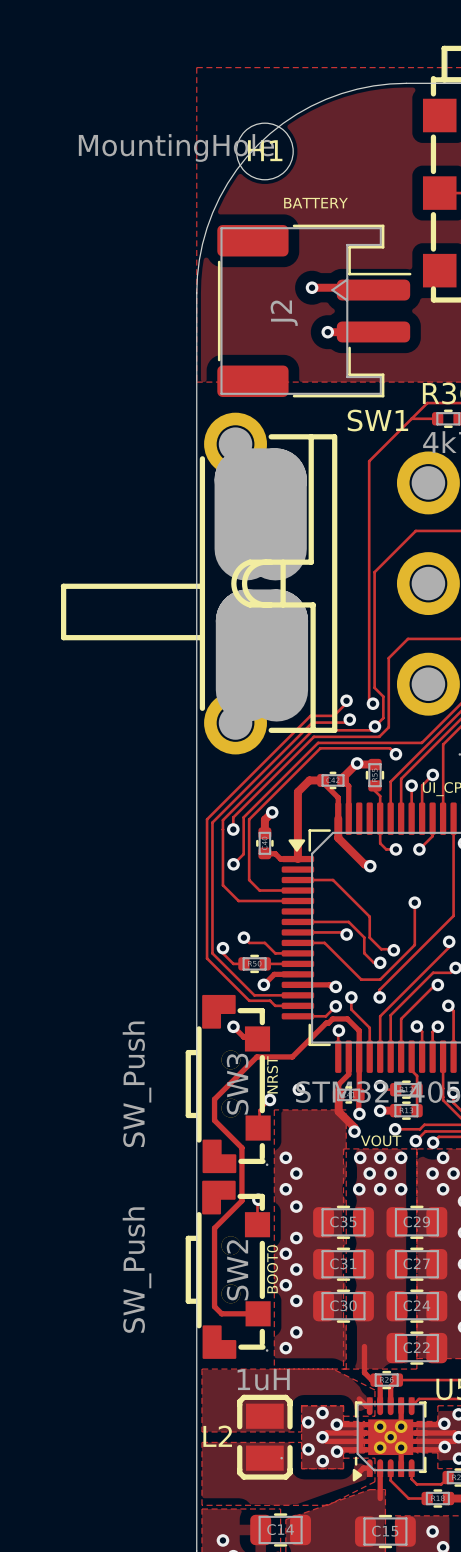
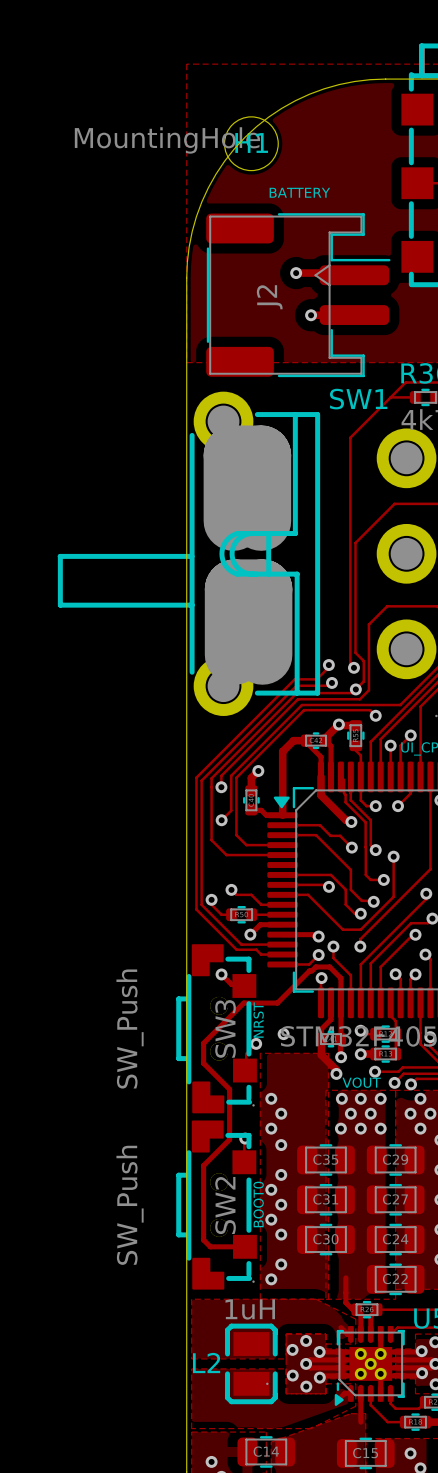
track: none -> (340, 776) (344, 780) (345, 802) (365, 822) (365, 847)
track: none -> (350, 793) (350, 800) (370, 820) (370, 845) (375, 850)
track: none -> (282, 825) (319, 825) (330, 835) (340, 835) (351, 847)
track: none -> (365, 847) (365, 874) (370, 879) (383, 879)
via: none -> (351, 847)
via: none -> (375, 850)
via: none -> (383, 879)

